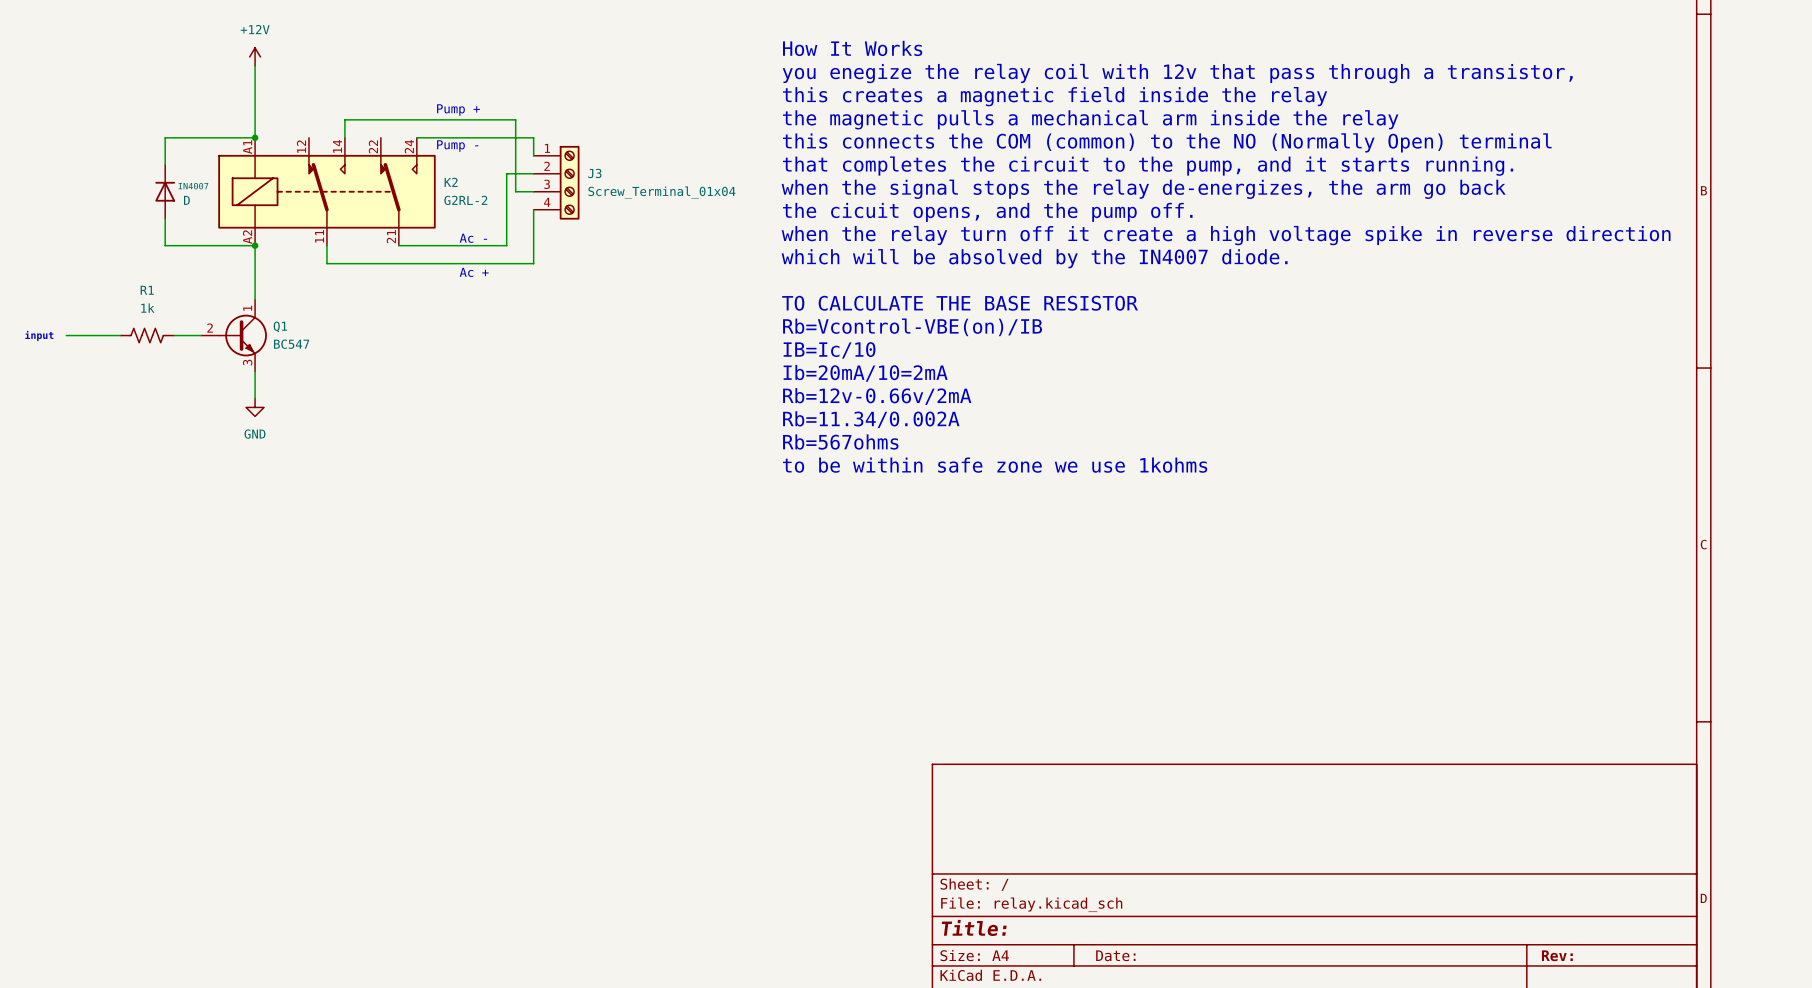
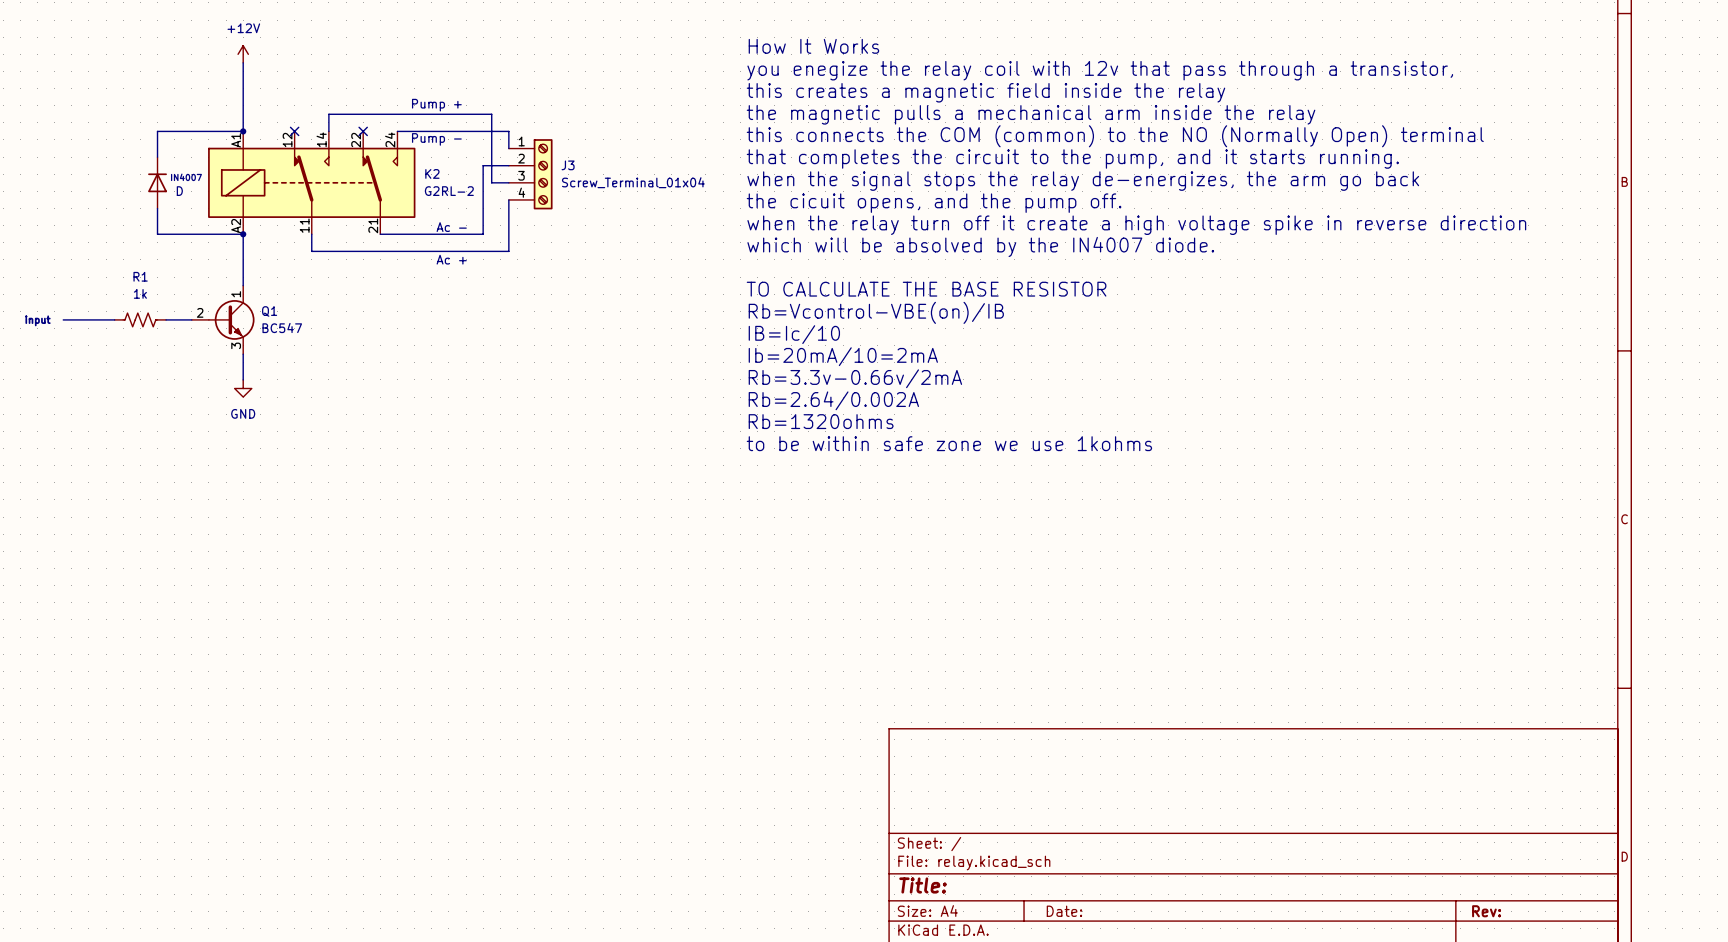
no-connect mark: none -> (294, 131)
no-connect mark: none -> (363, 131)
text: Rb=12v-0.66v/2mA (877, 396) -> Rb=3.3v-0.66v/2mA (855, 378)
text: Rb=11.34/0.002A (871, 419) -> Rb=2.64/0.002A (833, 400)
text: Rb=567ohms (840, 441) -> Rb=1320ohms (821, 421)

